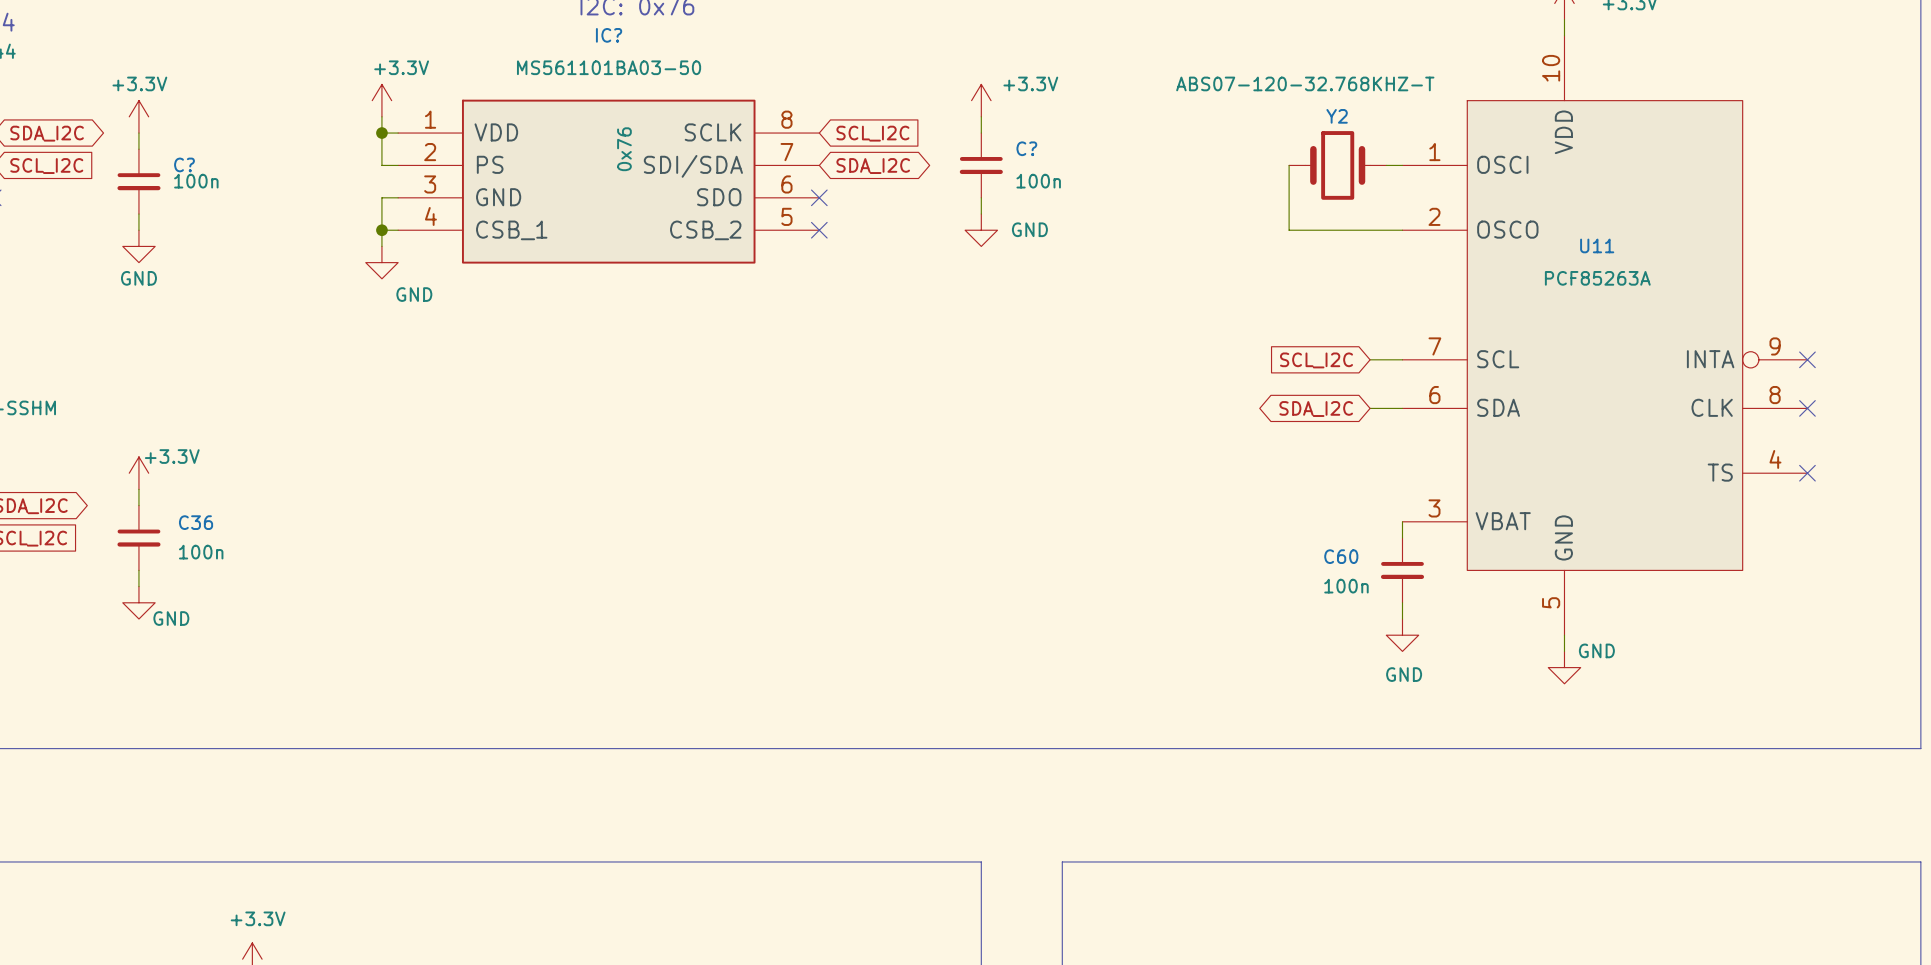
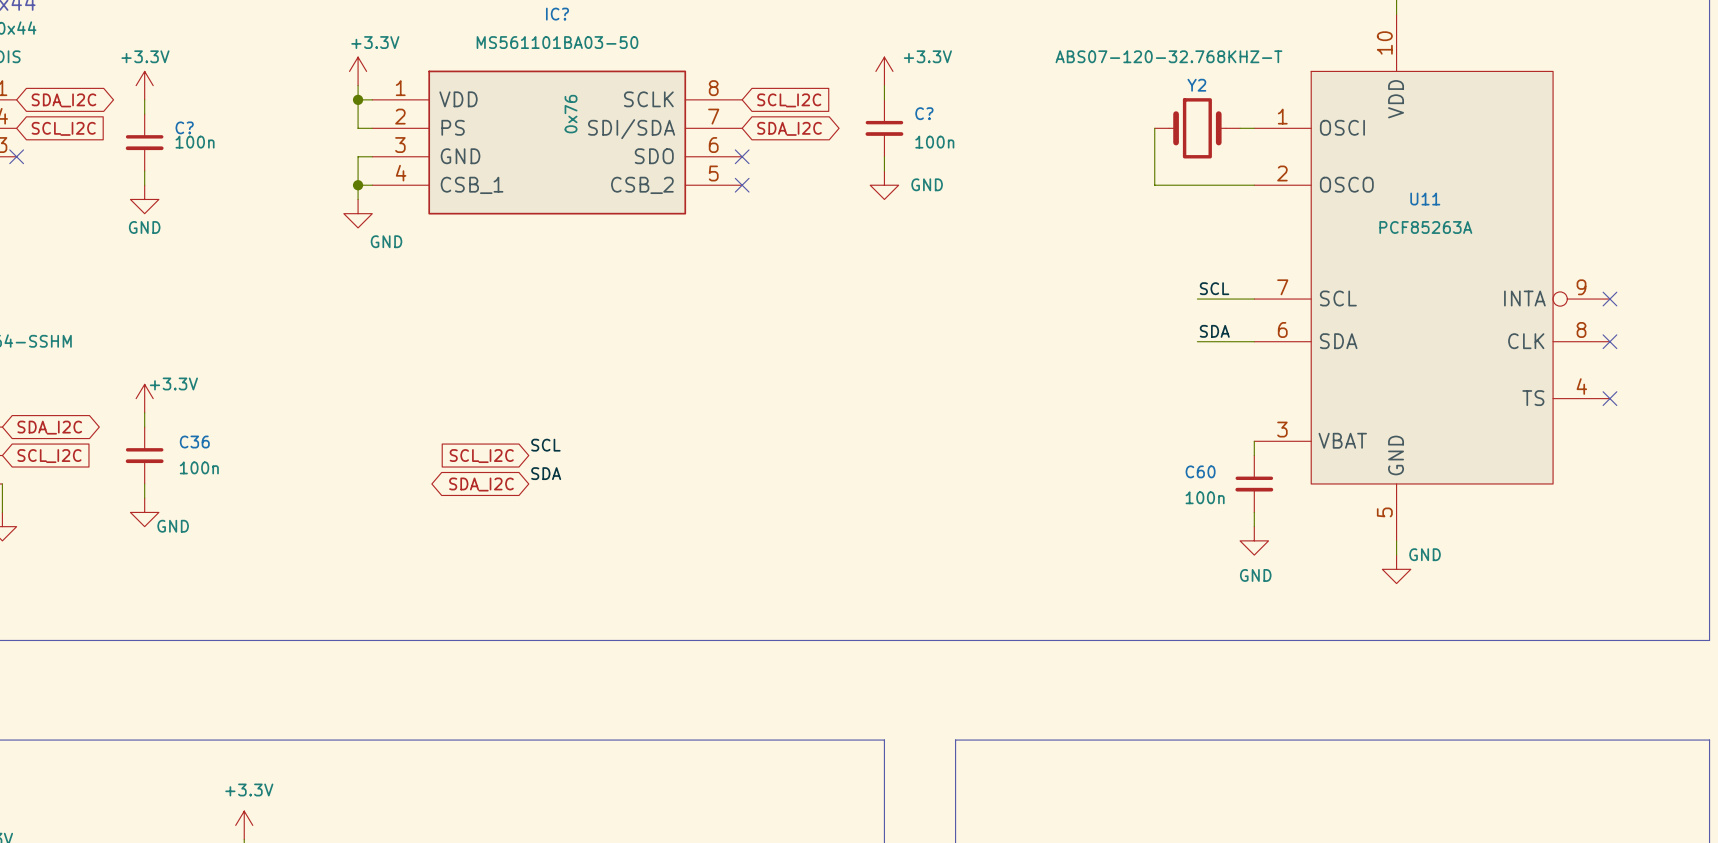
label: none -> SCL (1214, 288)
wire: none -> (1197, 299) (1225, 299)
global label: SCL_I2C (1316, 360) -> none
label: none -> SDA (1214, 331)
wire: none -> (1197, 341) (1225, 341)
global label: SDA_I2C (1316, 409) -> none
label: none -> SCL (545, 445)
global label: none -> SCL_I2C (481, 456)
label: none -> SDA (546, 473)
global label: none -> SDA_I2C (481, 484)

